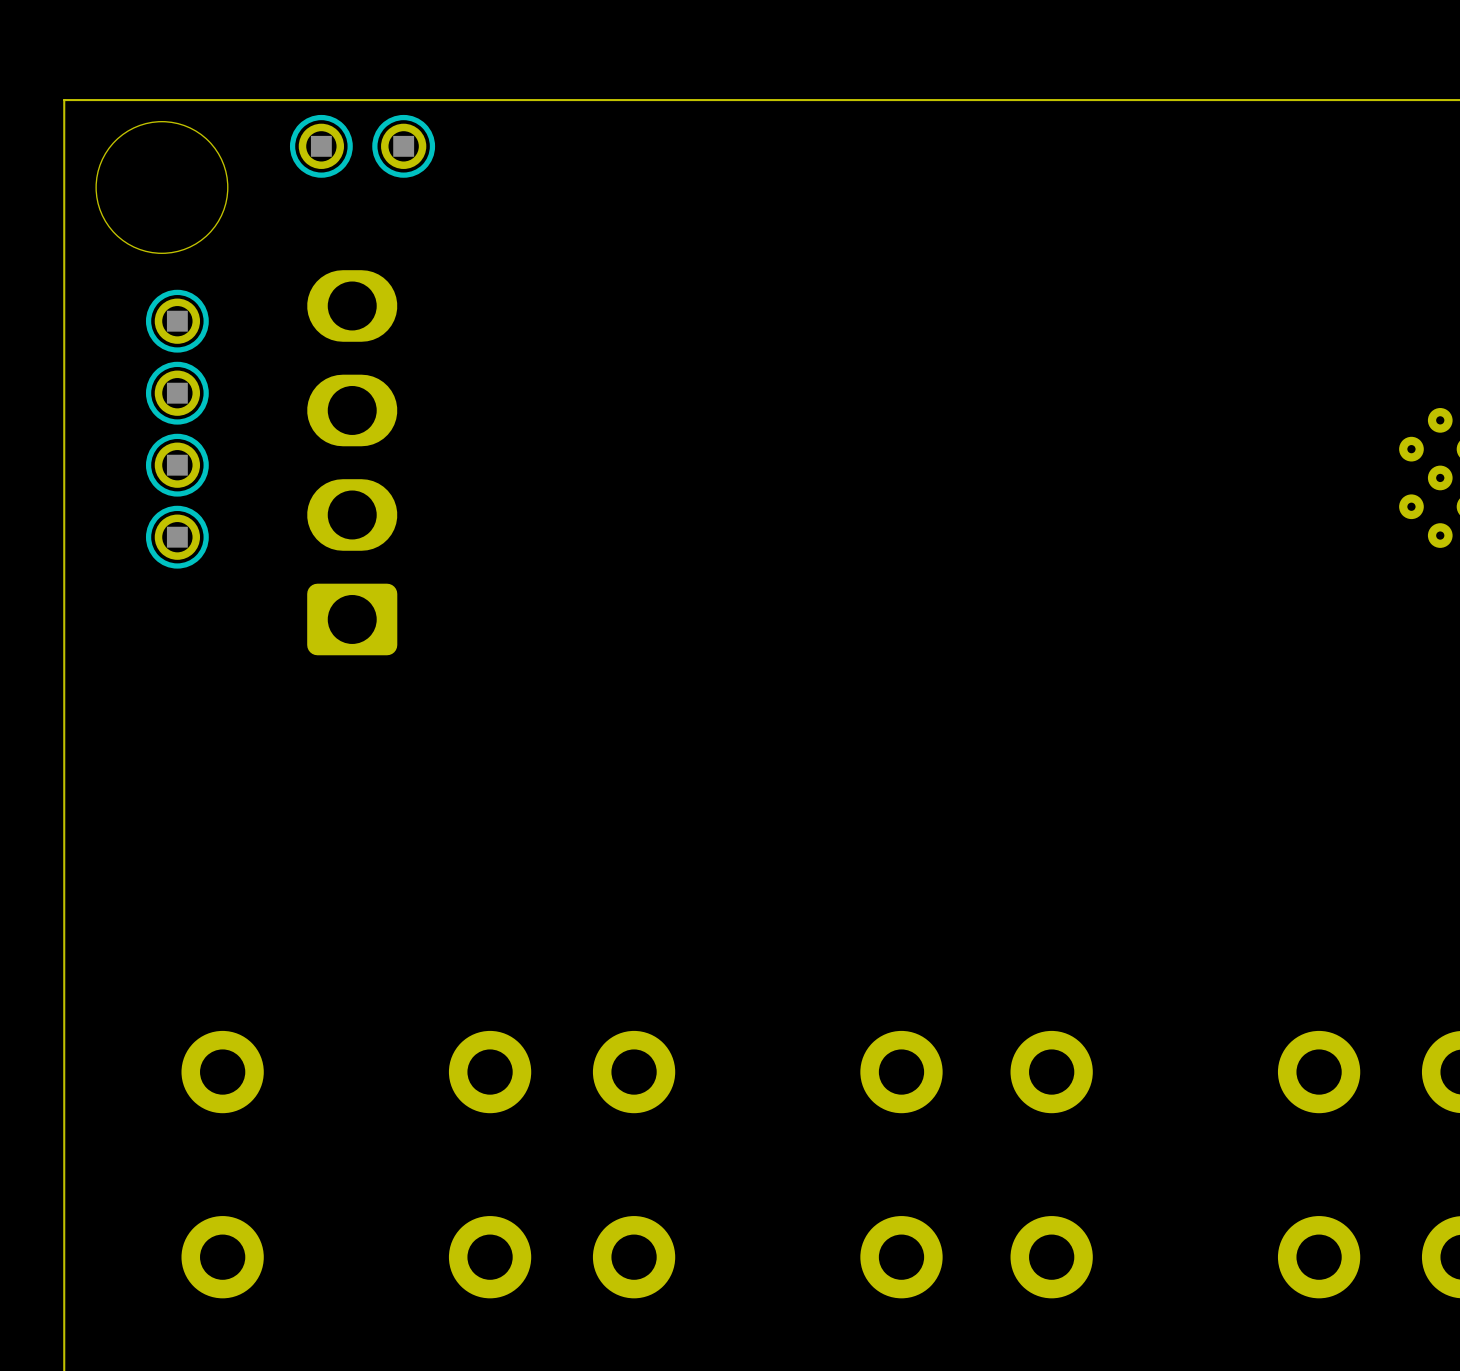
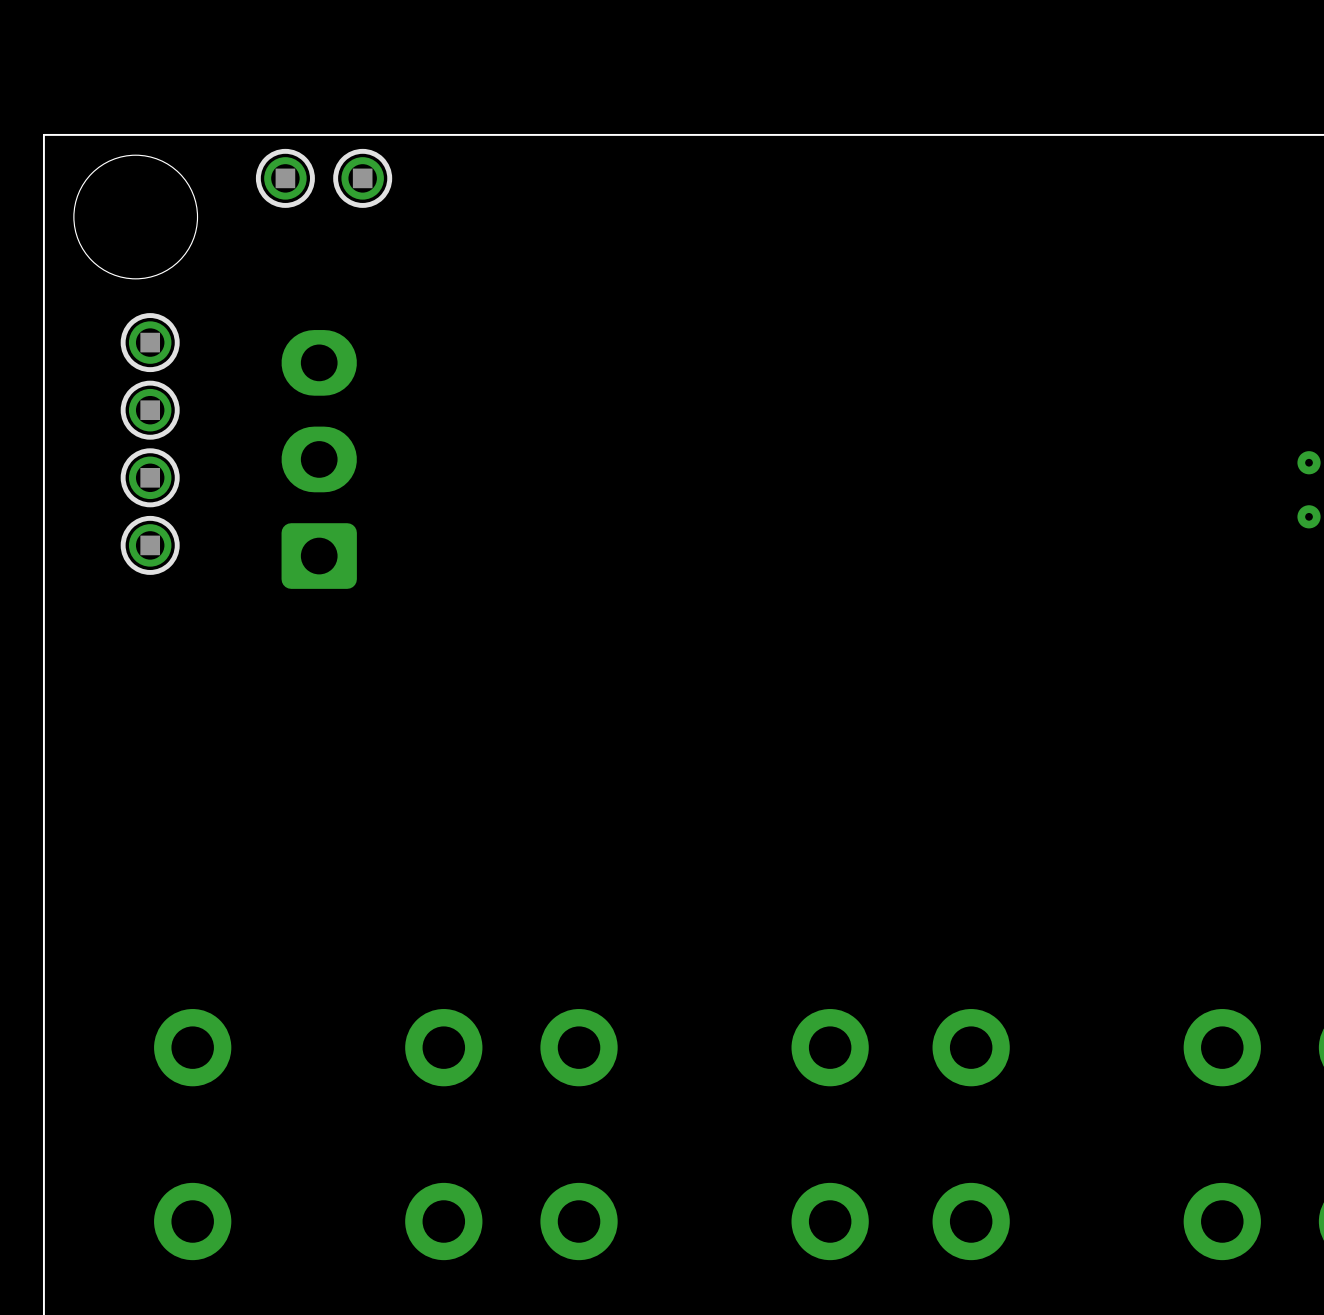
part footprint: [307, 270, 398, 656] -> [281, 330, 357, 589]

